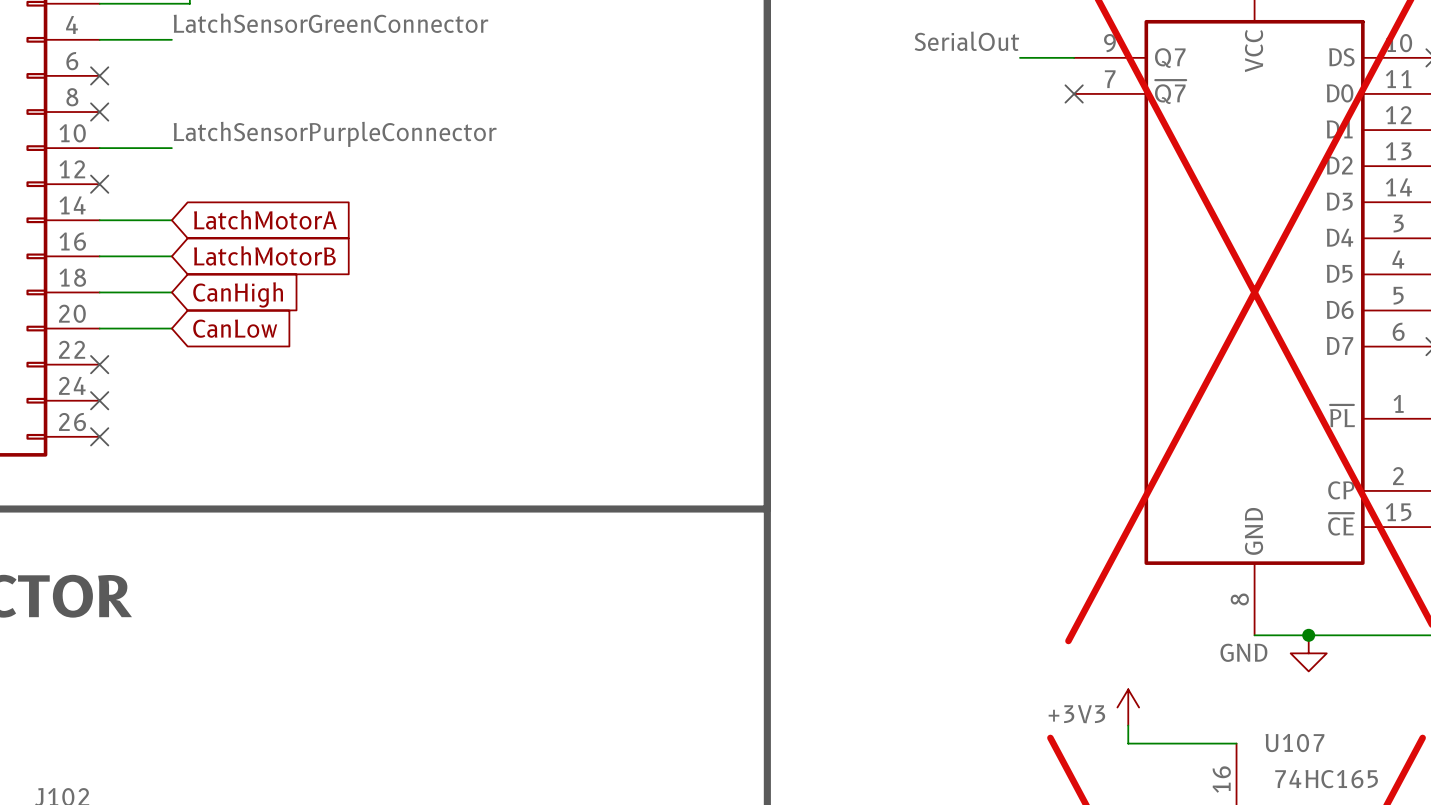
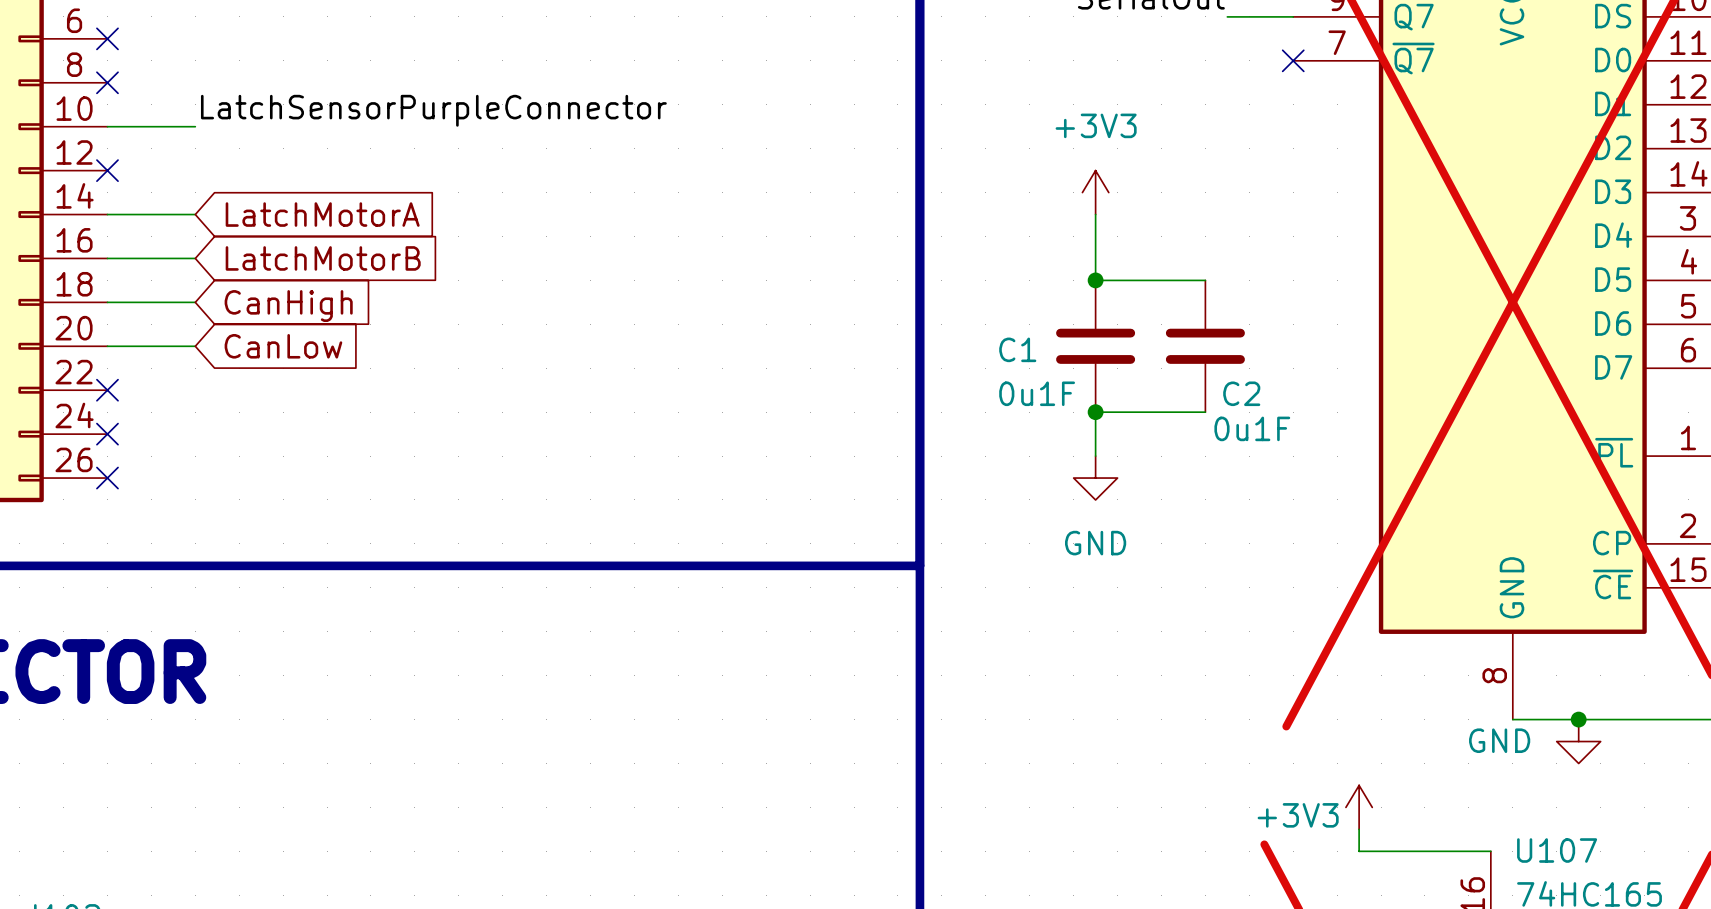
power symbol: none -> +3V3 (1095, 192)
wire: none -> (1095, 214) (1095, 280) (1205, 280)
junction: none -> (1095, 280)
C1: none -> 0u1F (1095, 346)
C2: none -> 0u1F (1205, 346)
junction: none -> (1095, 412)
wire: none -> (1205, 412) (1095, 412) (1095, 456)
power symbol: none -> GND (1095, 478)

